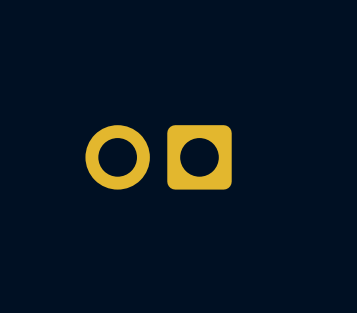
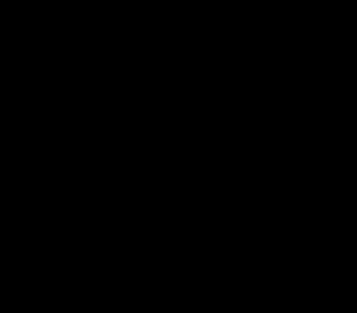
part: (158, 157) -> none

